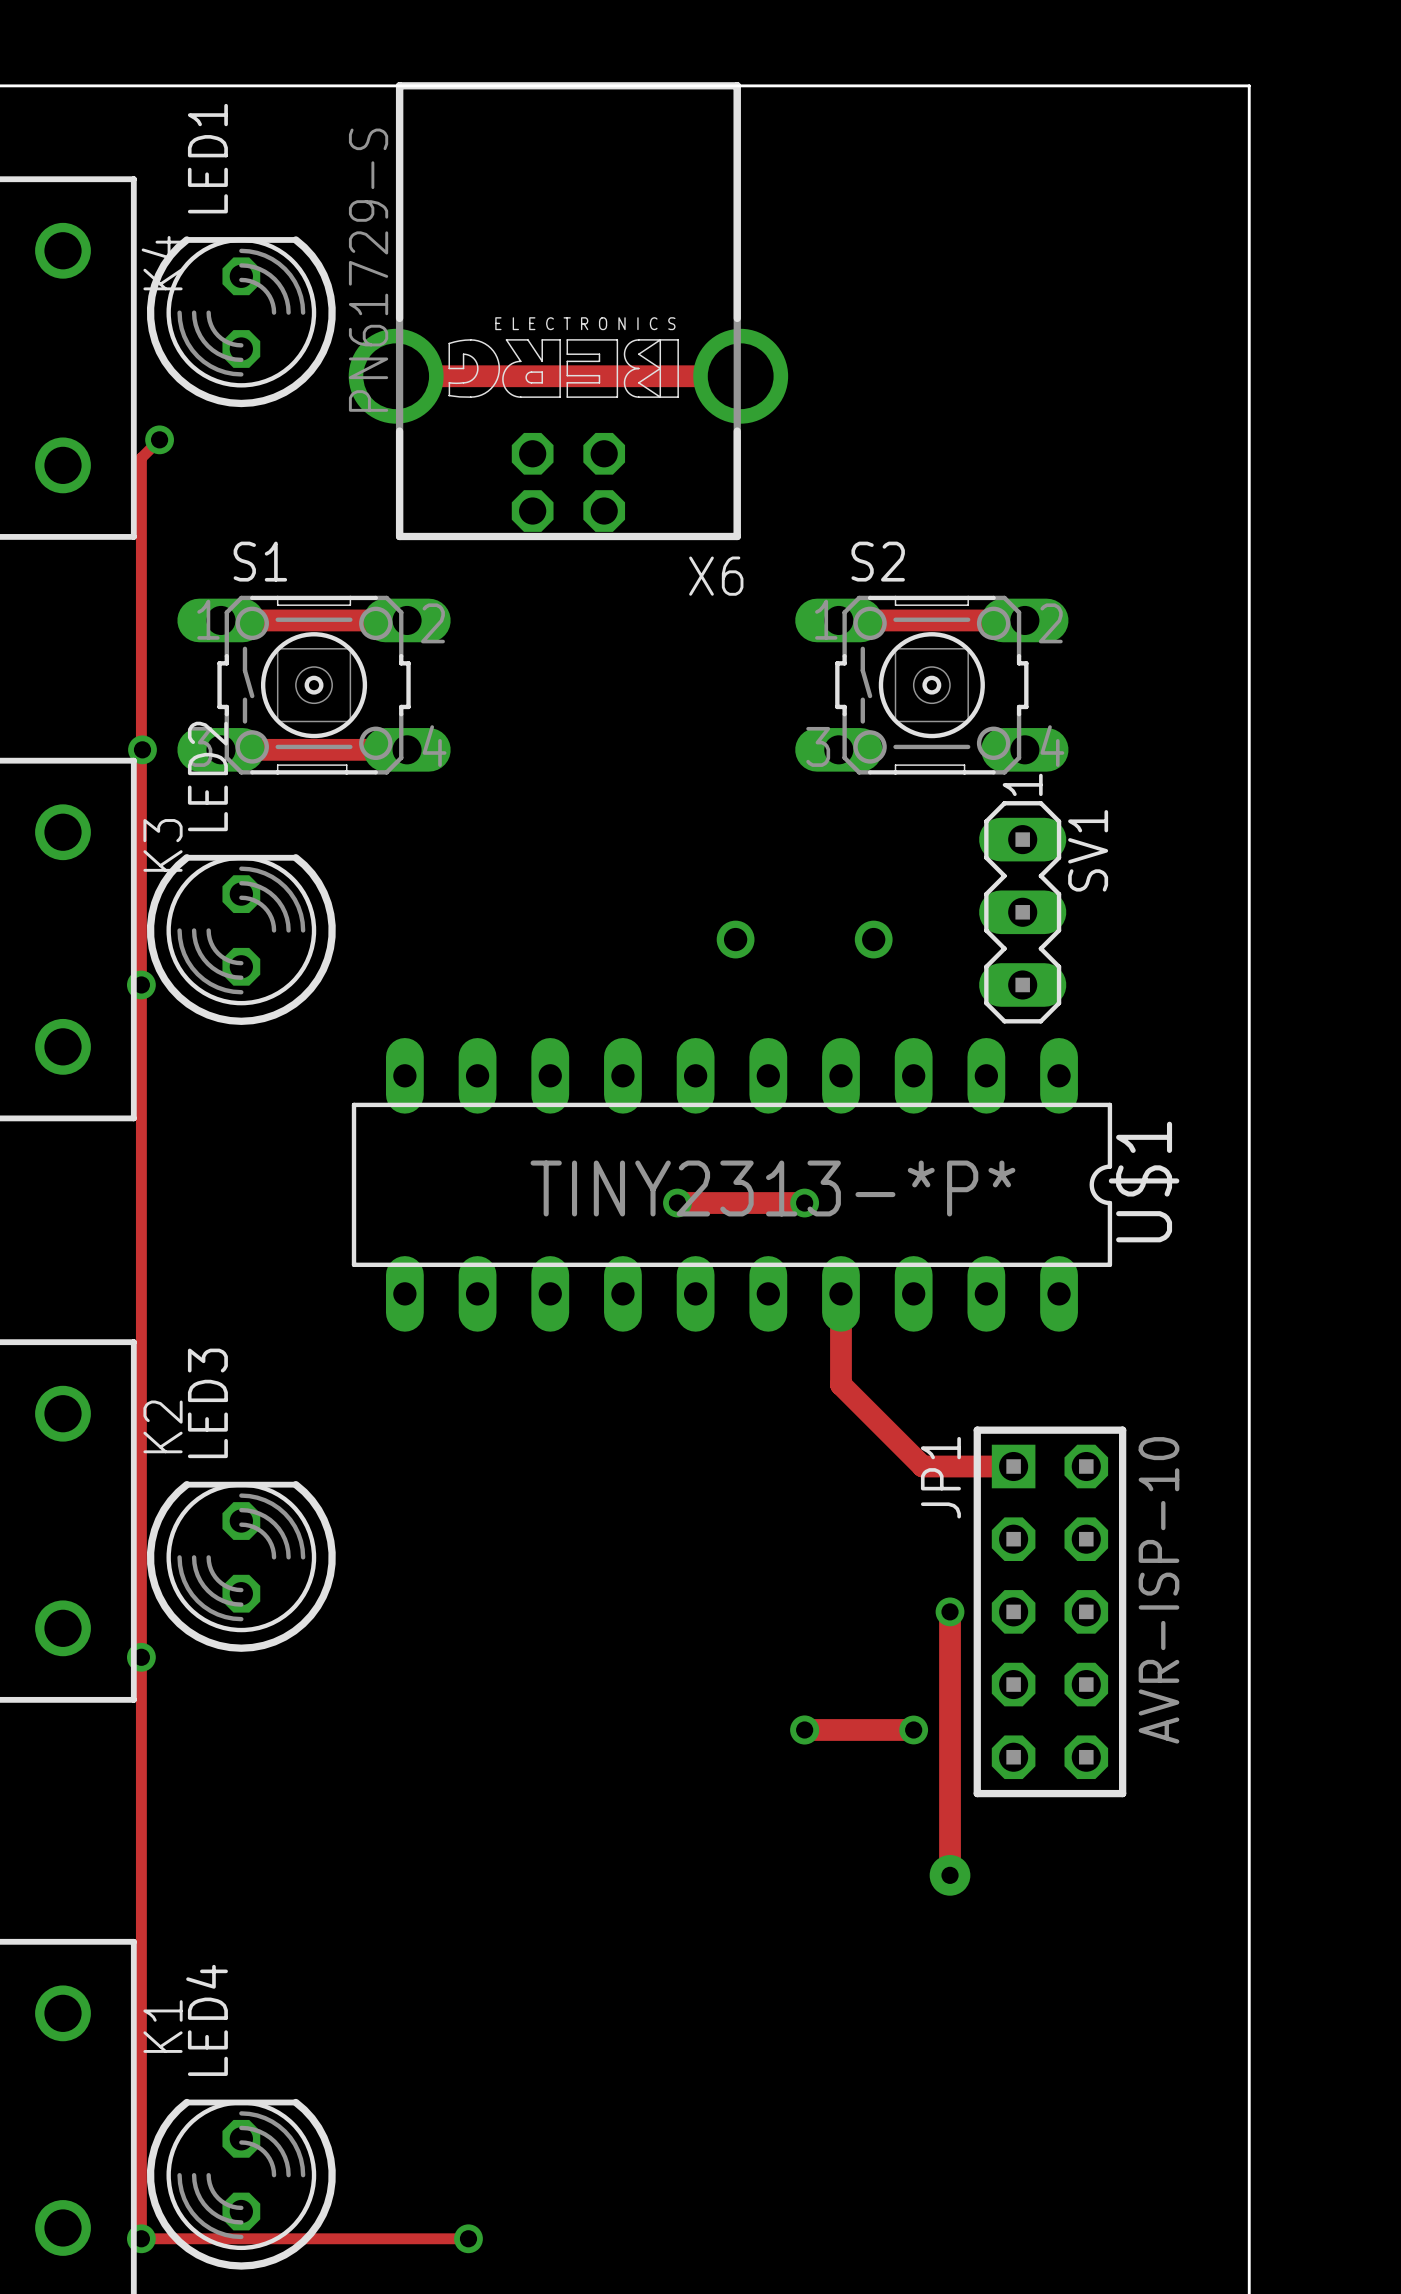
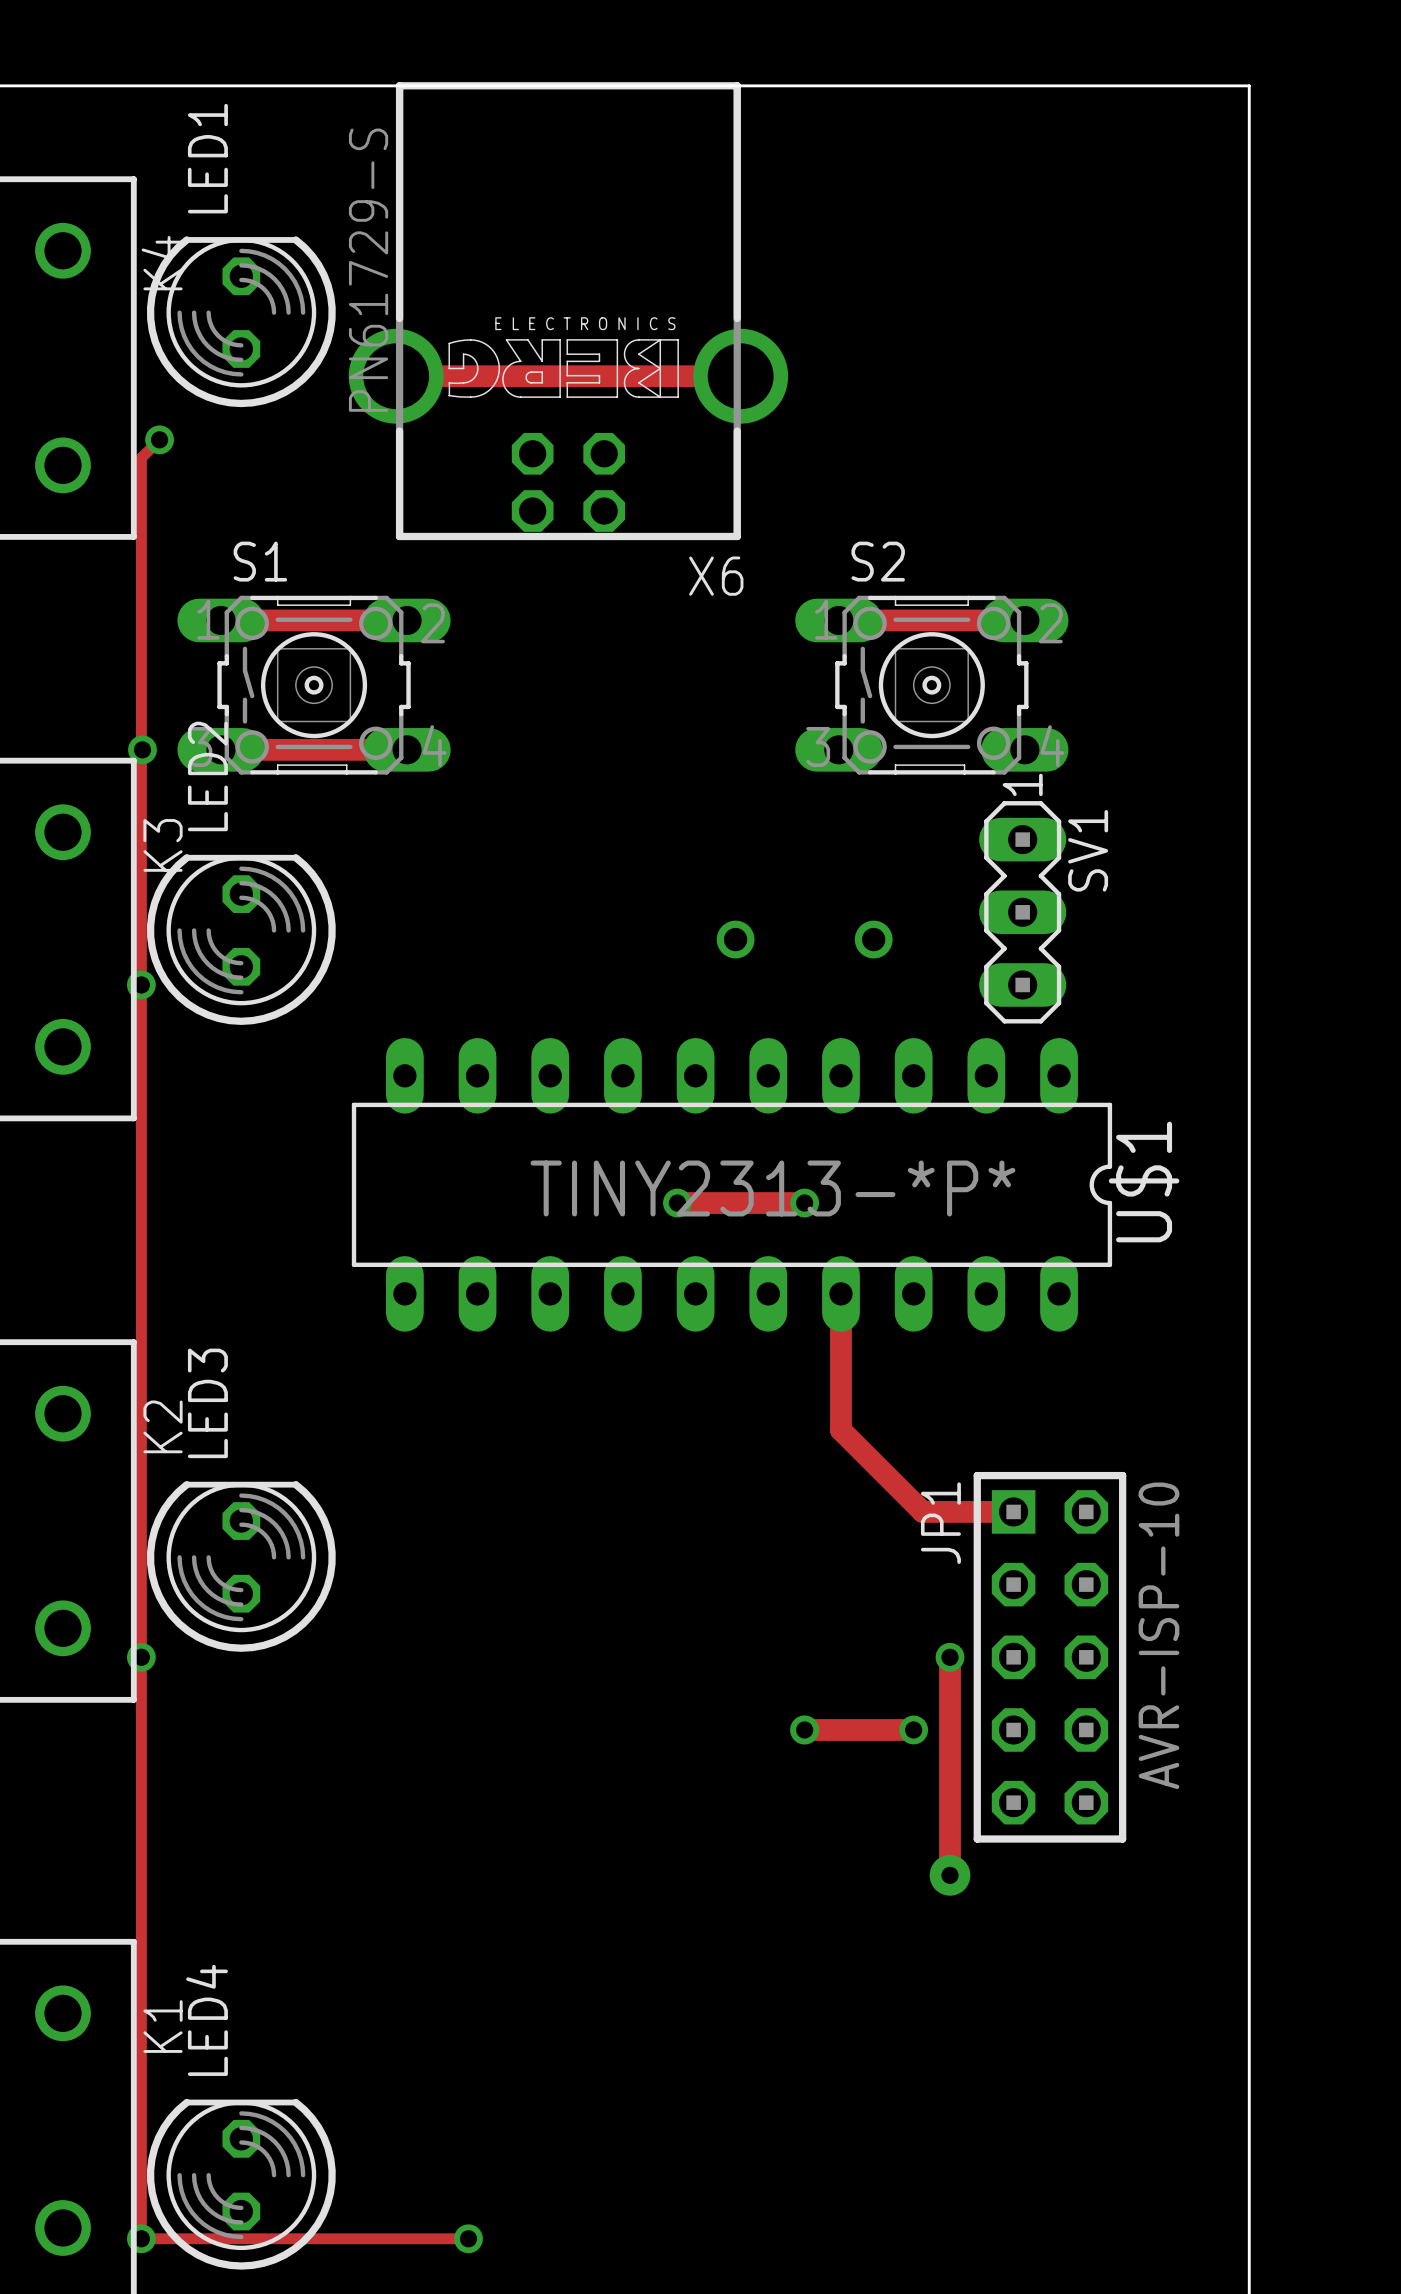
track: (840, 1384) (922, 1466) (1013, 1466) -> (840, 1384) (840, 1430) (922, 1511) (1013, 1511)
track: (950, 1611) (950, 1657) -> none
via position: (950, 1611) -> (950, 1657)
JP1 position: (1049, 1611) -> (1049, 1657)

